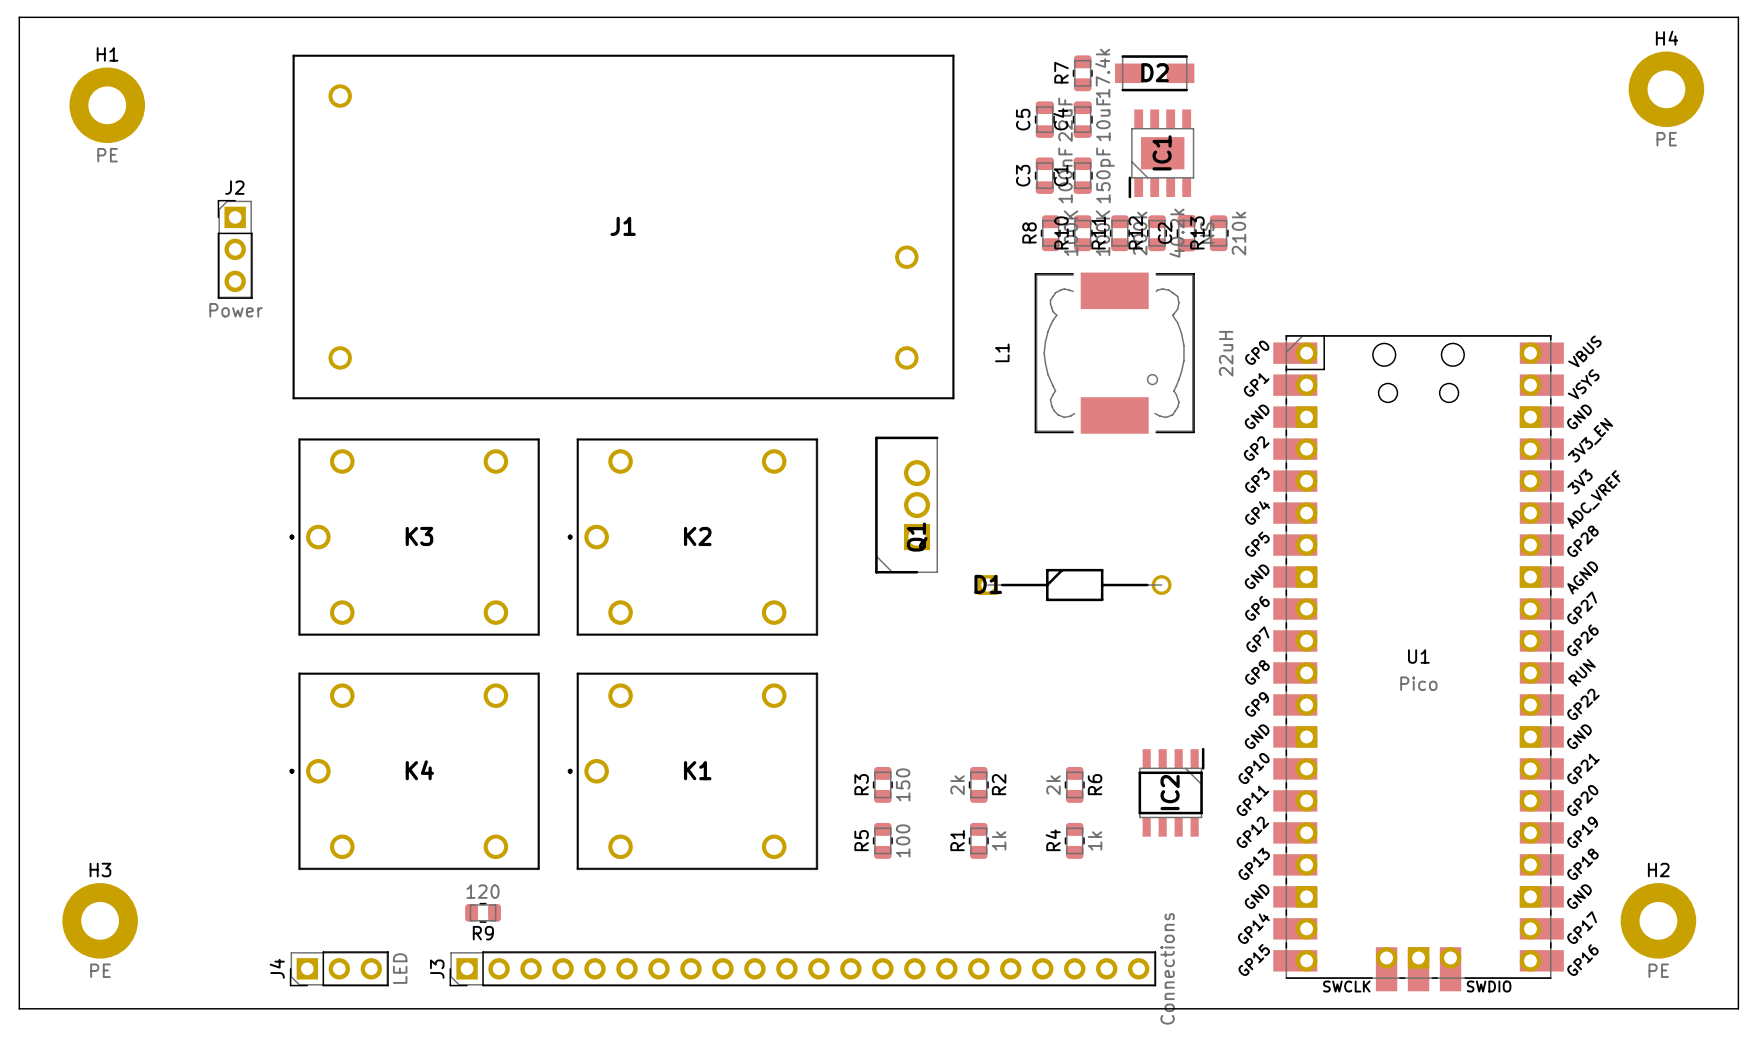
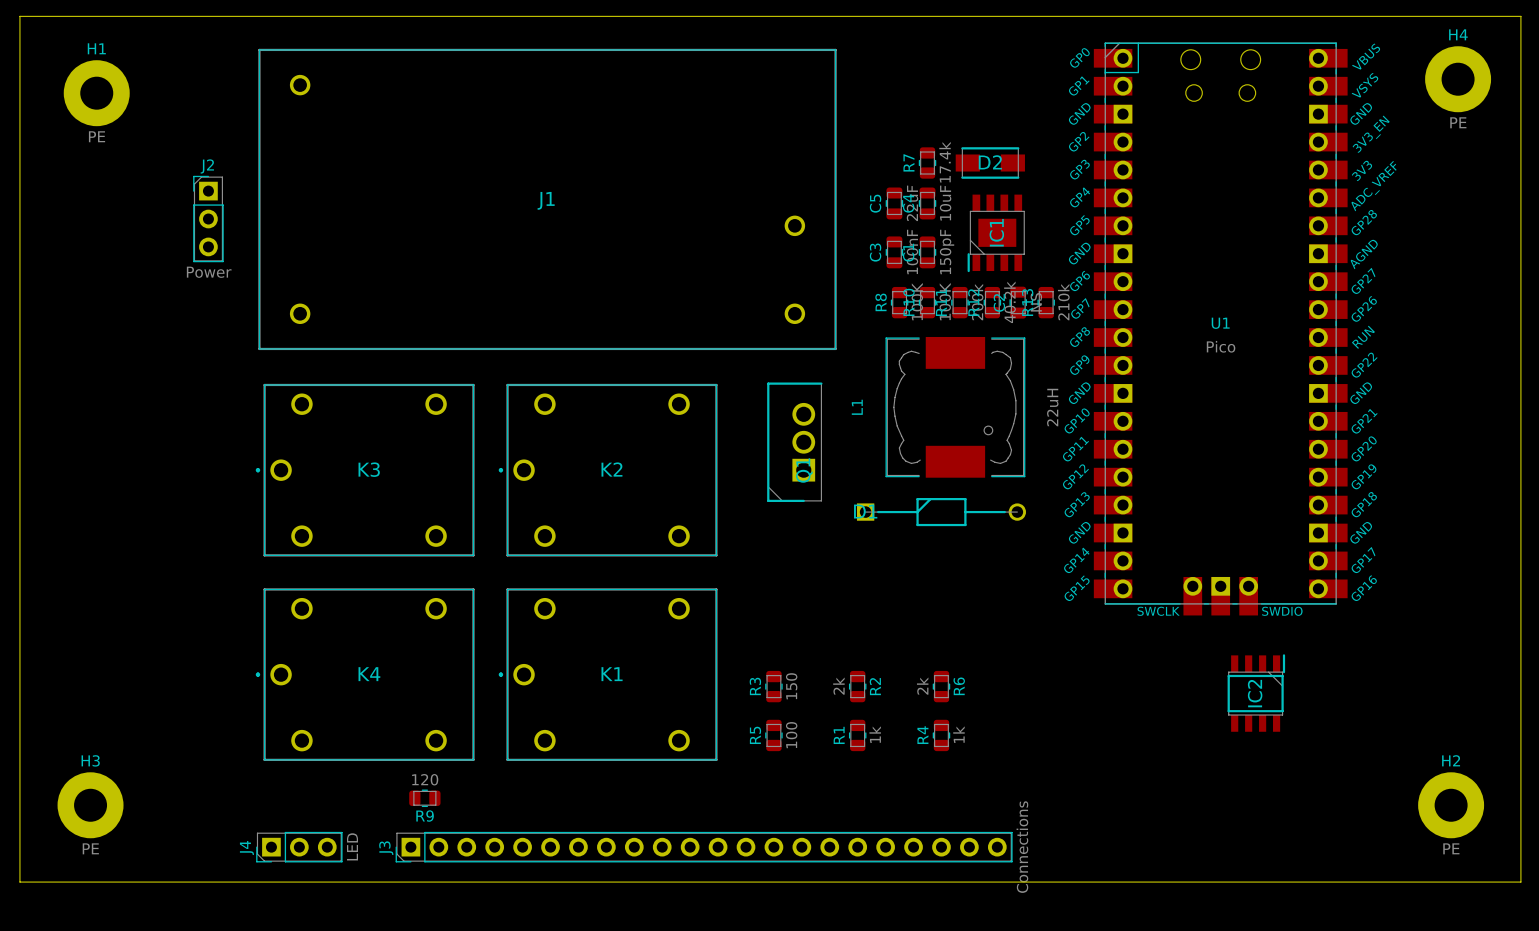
R7 position: (1082, 73) -> (927, 163)
D2 position: (1154, 73) -> (990, 163)
C5 position: (1044, 119) -> (894, 203)
C4 position: (1082, 119) -> (927, 203)
IC1 position: (1161, 153) -> (996, 233)
C3 position: (1044, 175) -> (894, 252)
C1 position: (1082, 175) -> (927, 252)
R8 position: (1050, 233) -> (899, 302)
R10 position: (1082, 233) -> (927, 302)
R11 position: (1119, 233) -> (959, 302)
R12 position: (1157, 233) -> (992, 302)
C2 position: (1186, 233) -> (1018, 302)
R13 position: (1218, 233) -> (1046, 302)
L1 position: (1114, 353) -> (955, 407)
U1 position: (1418, 663) -> (1220, 329)
IC2 position: (1171, 792) -> (1256, 693)

